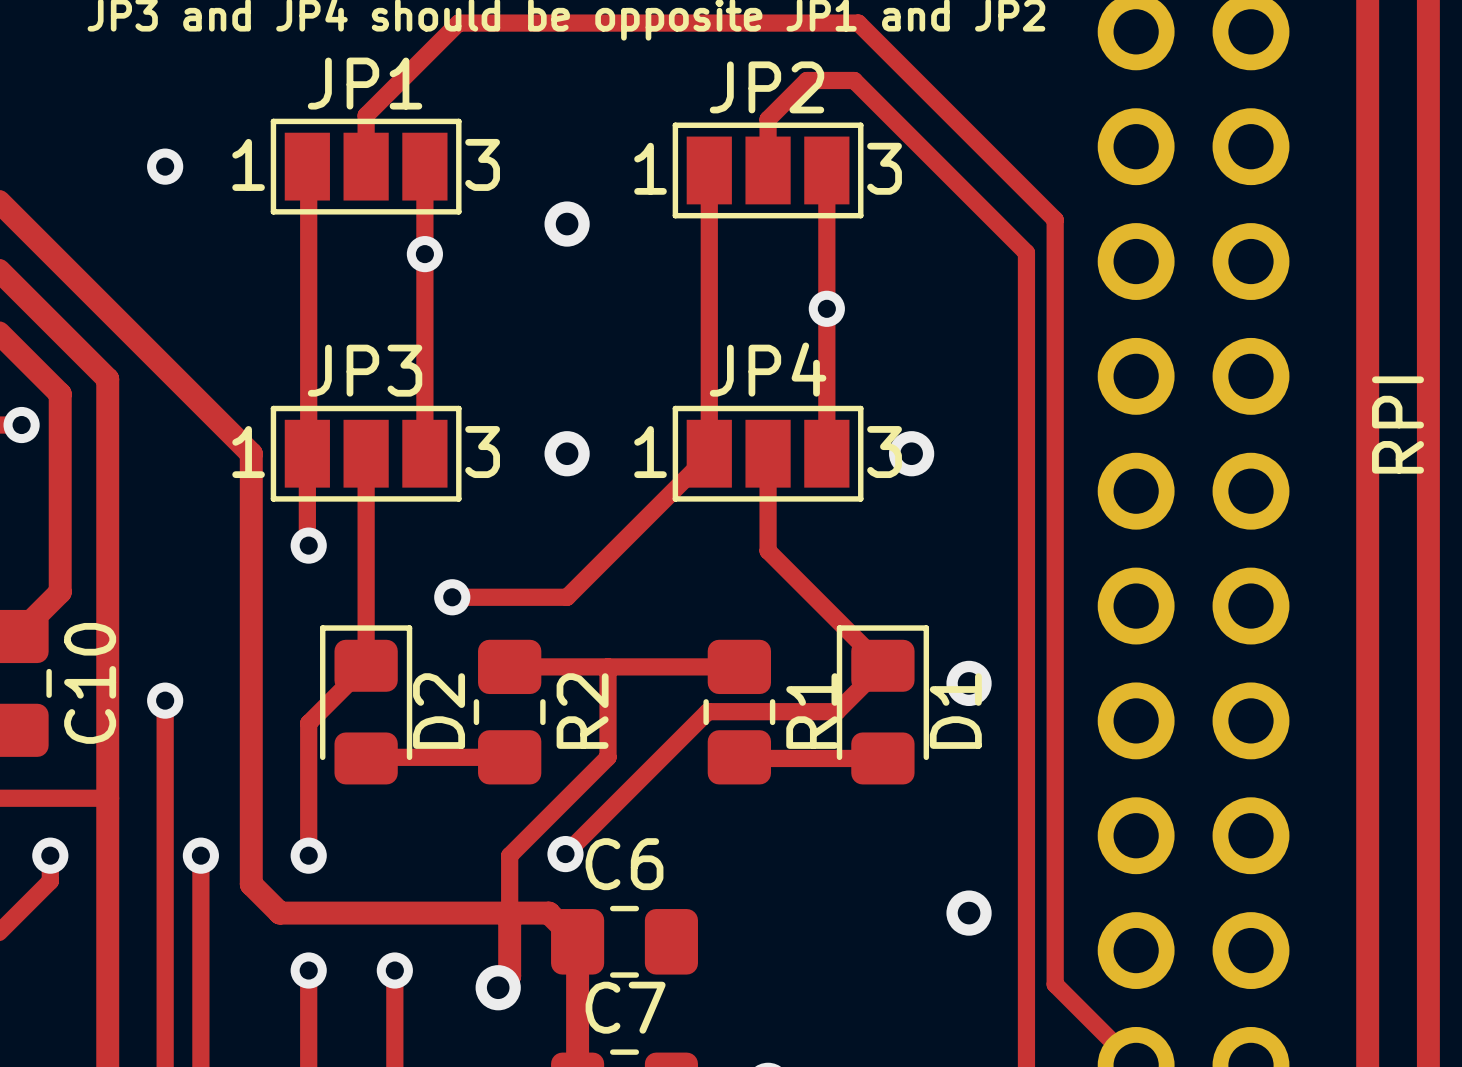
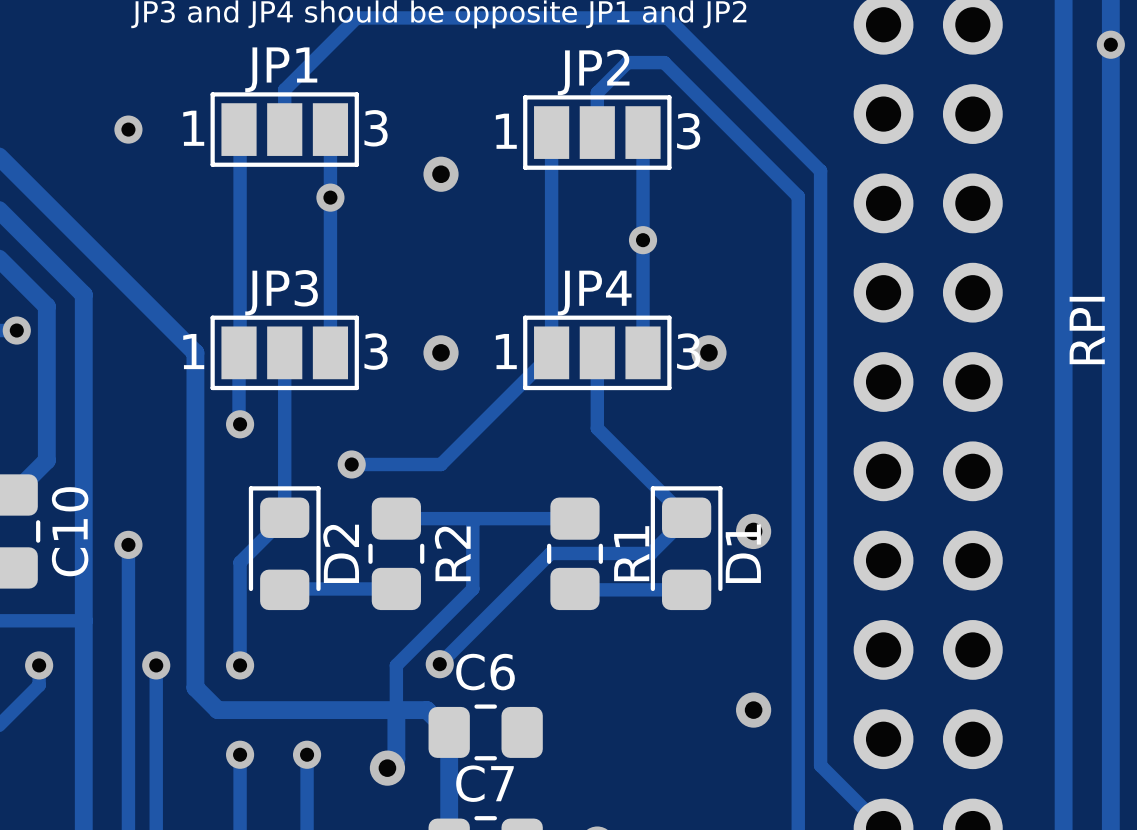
via: none -> (1110, 44)

